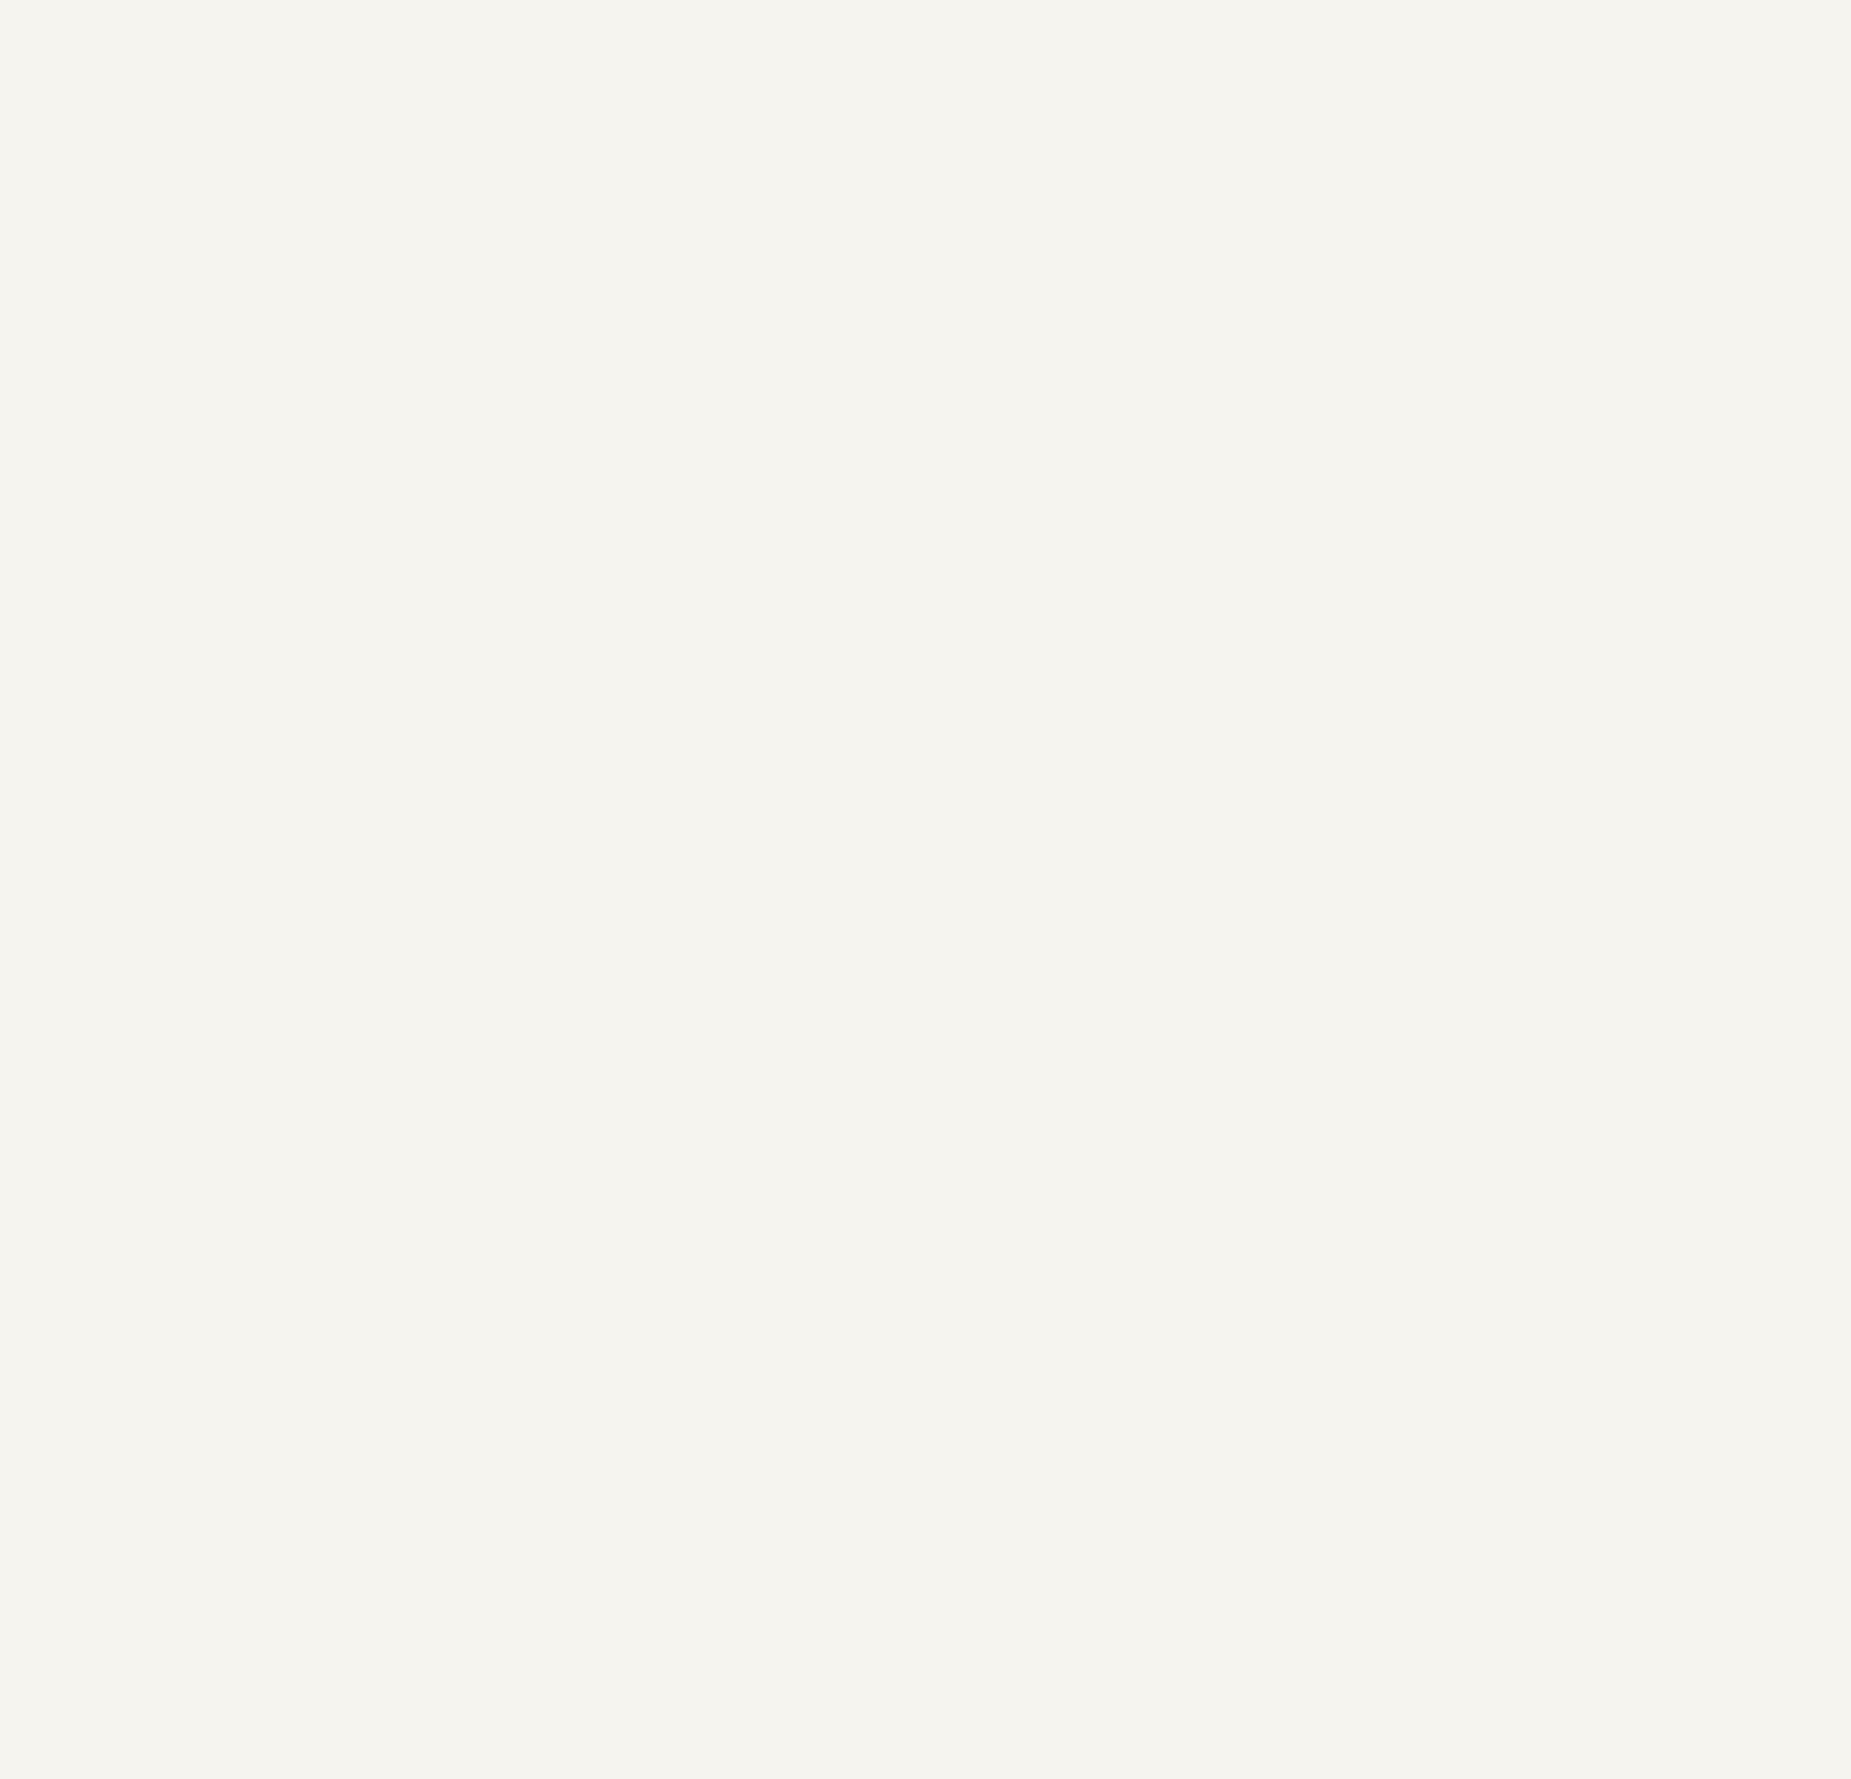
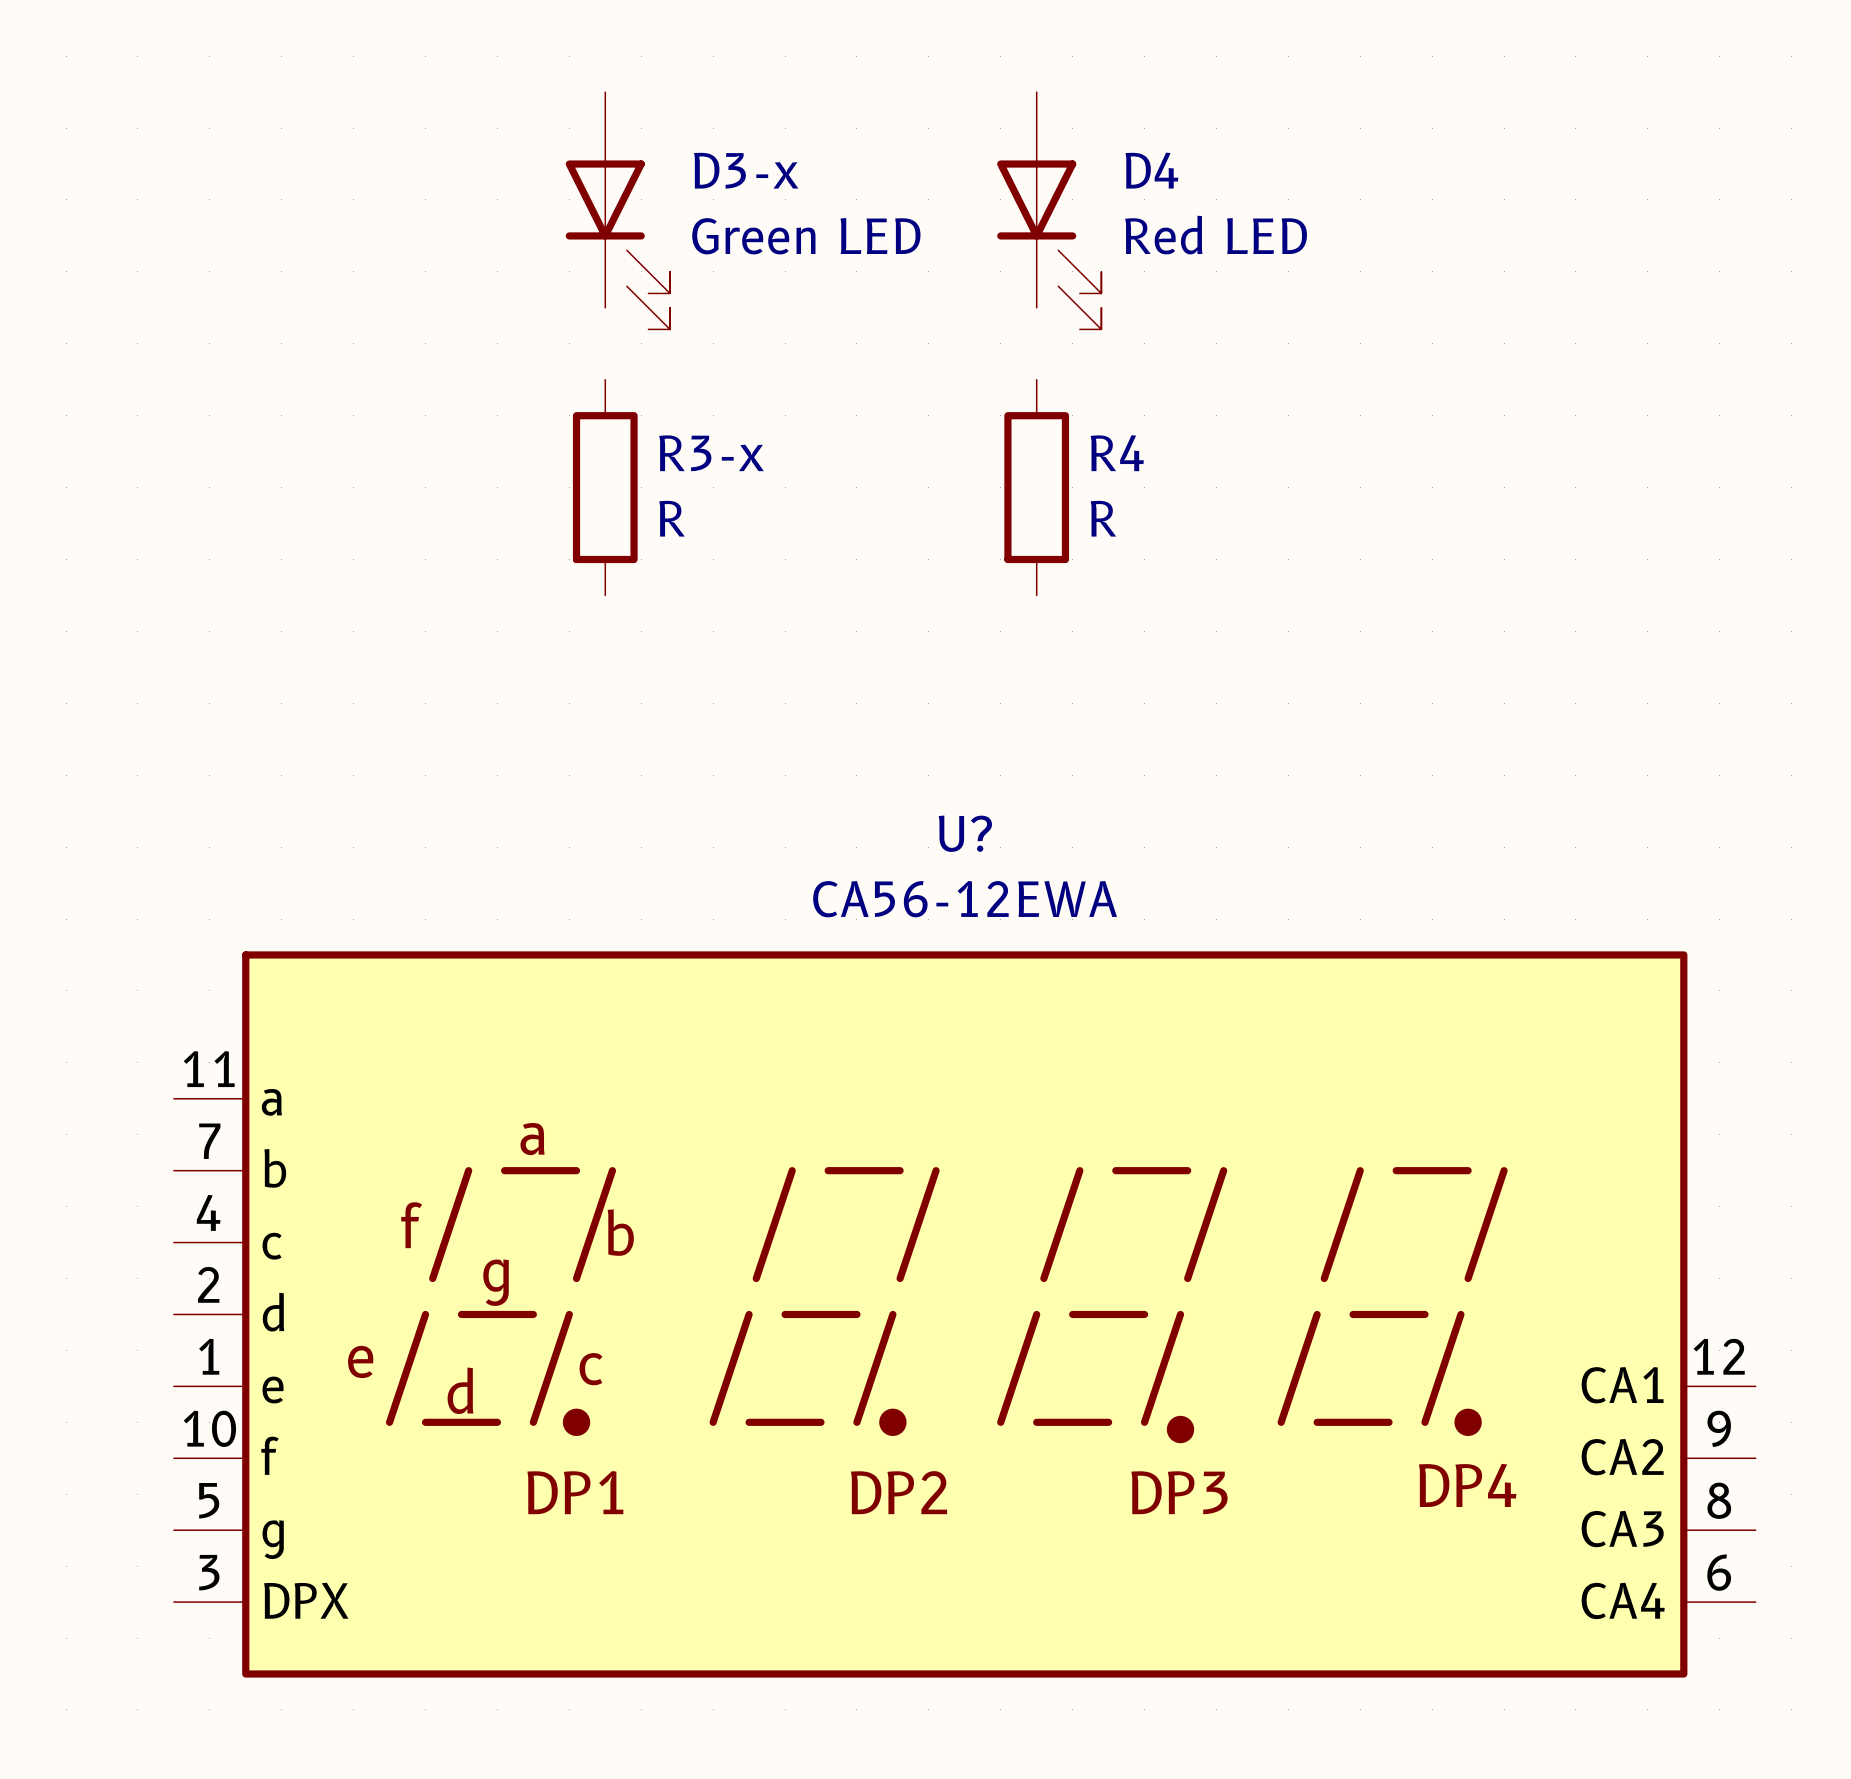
D3-x: none -> Green LED (617, 210)
D4: none -> Red LED (1049, 210)
R3-x: none -> R (605, 487)
R4: none -> R (1036, 487)
U?: none -> CA56-12EWA (964, 1314)

